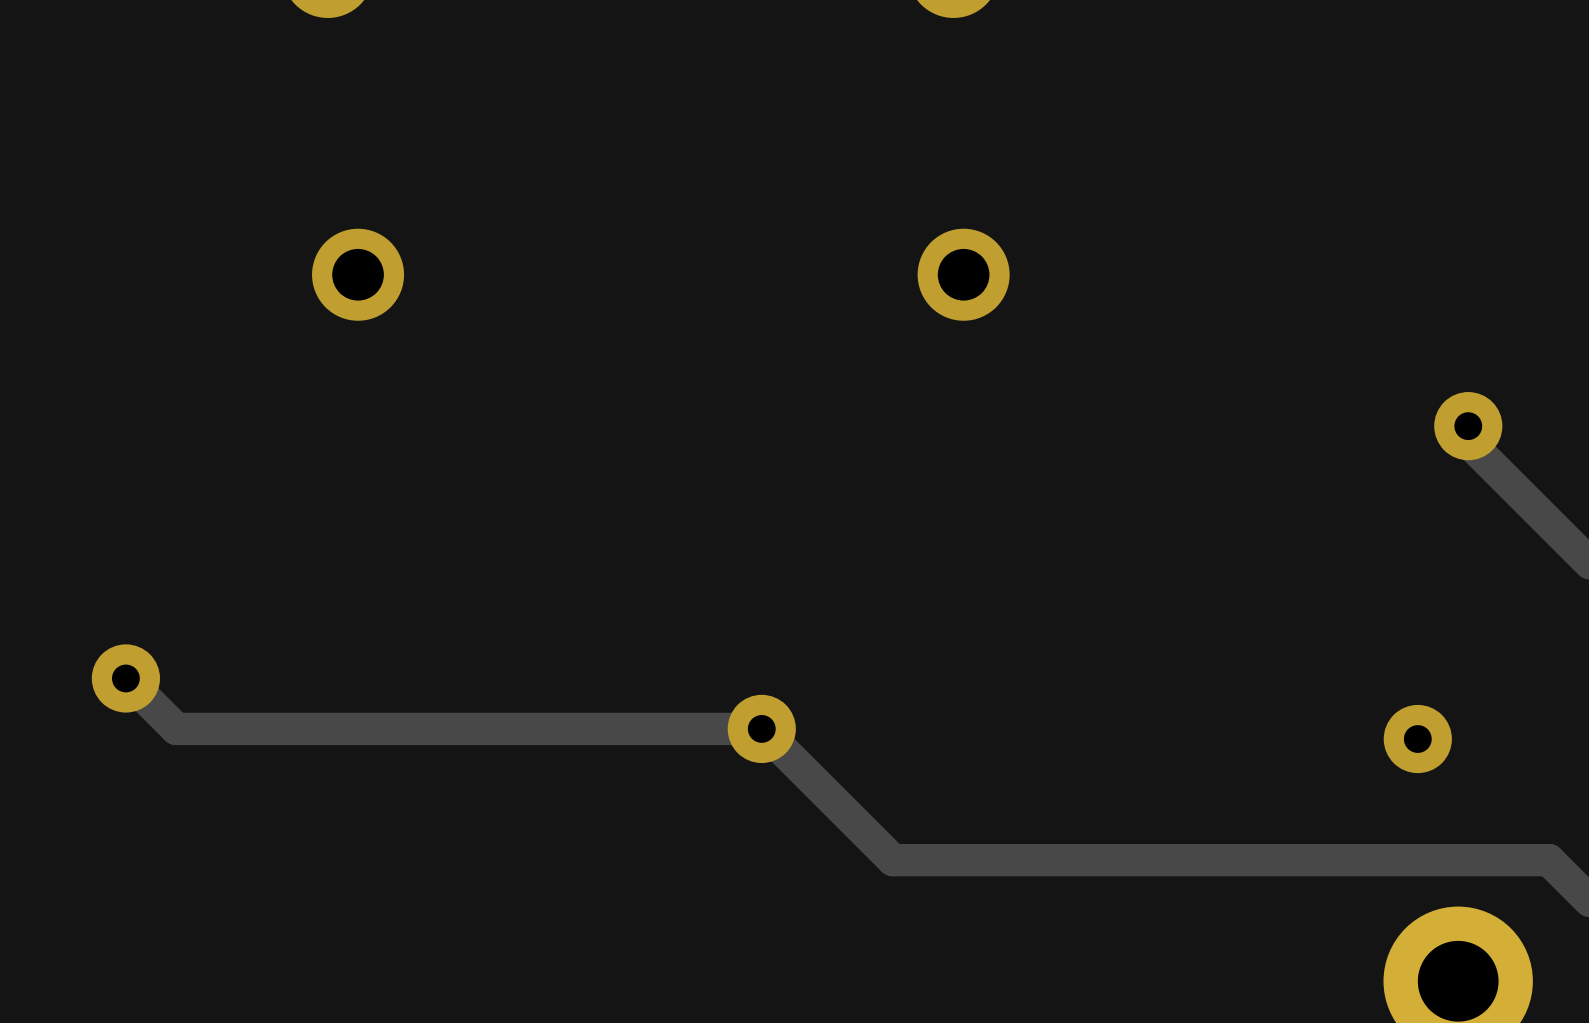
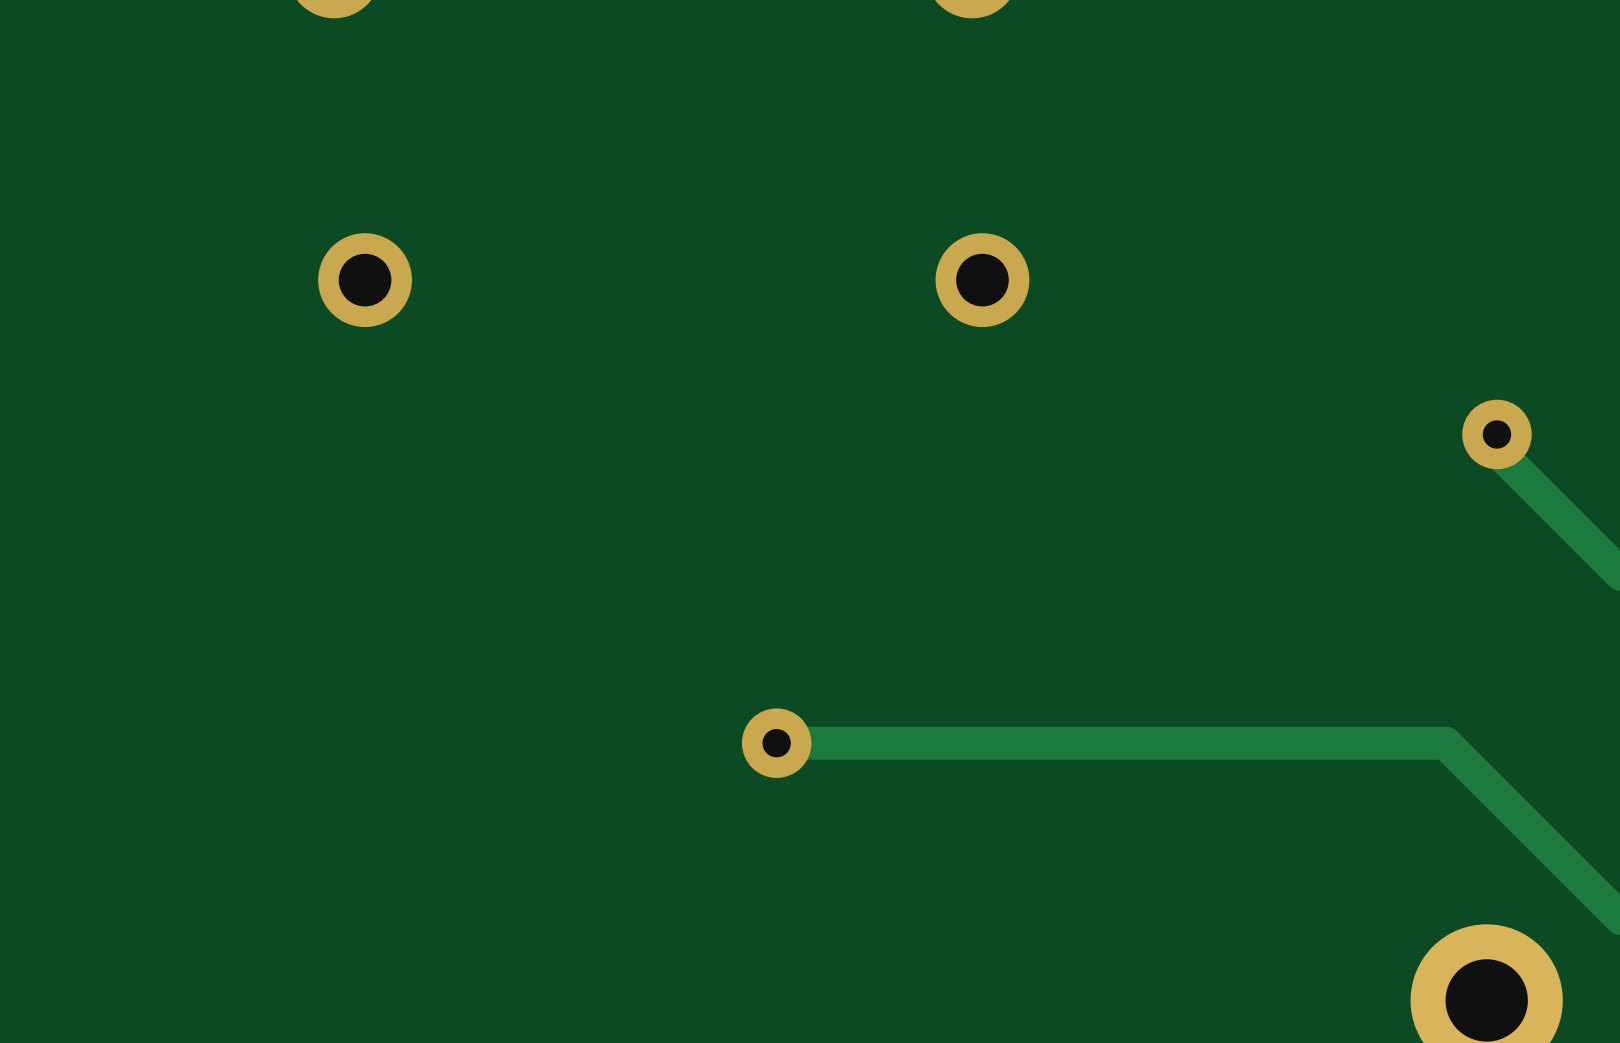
track: (125, 678) (176, 728) (761, 728) (892, 860) (1549, 860) -> (776, 743) (1445, 743) (1579, 876)
via: (125, 678) -> none
via: (1417, 739) -> none

